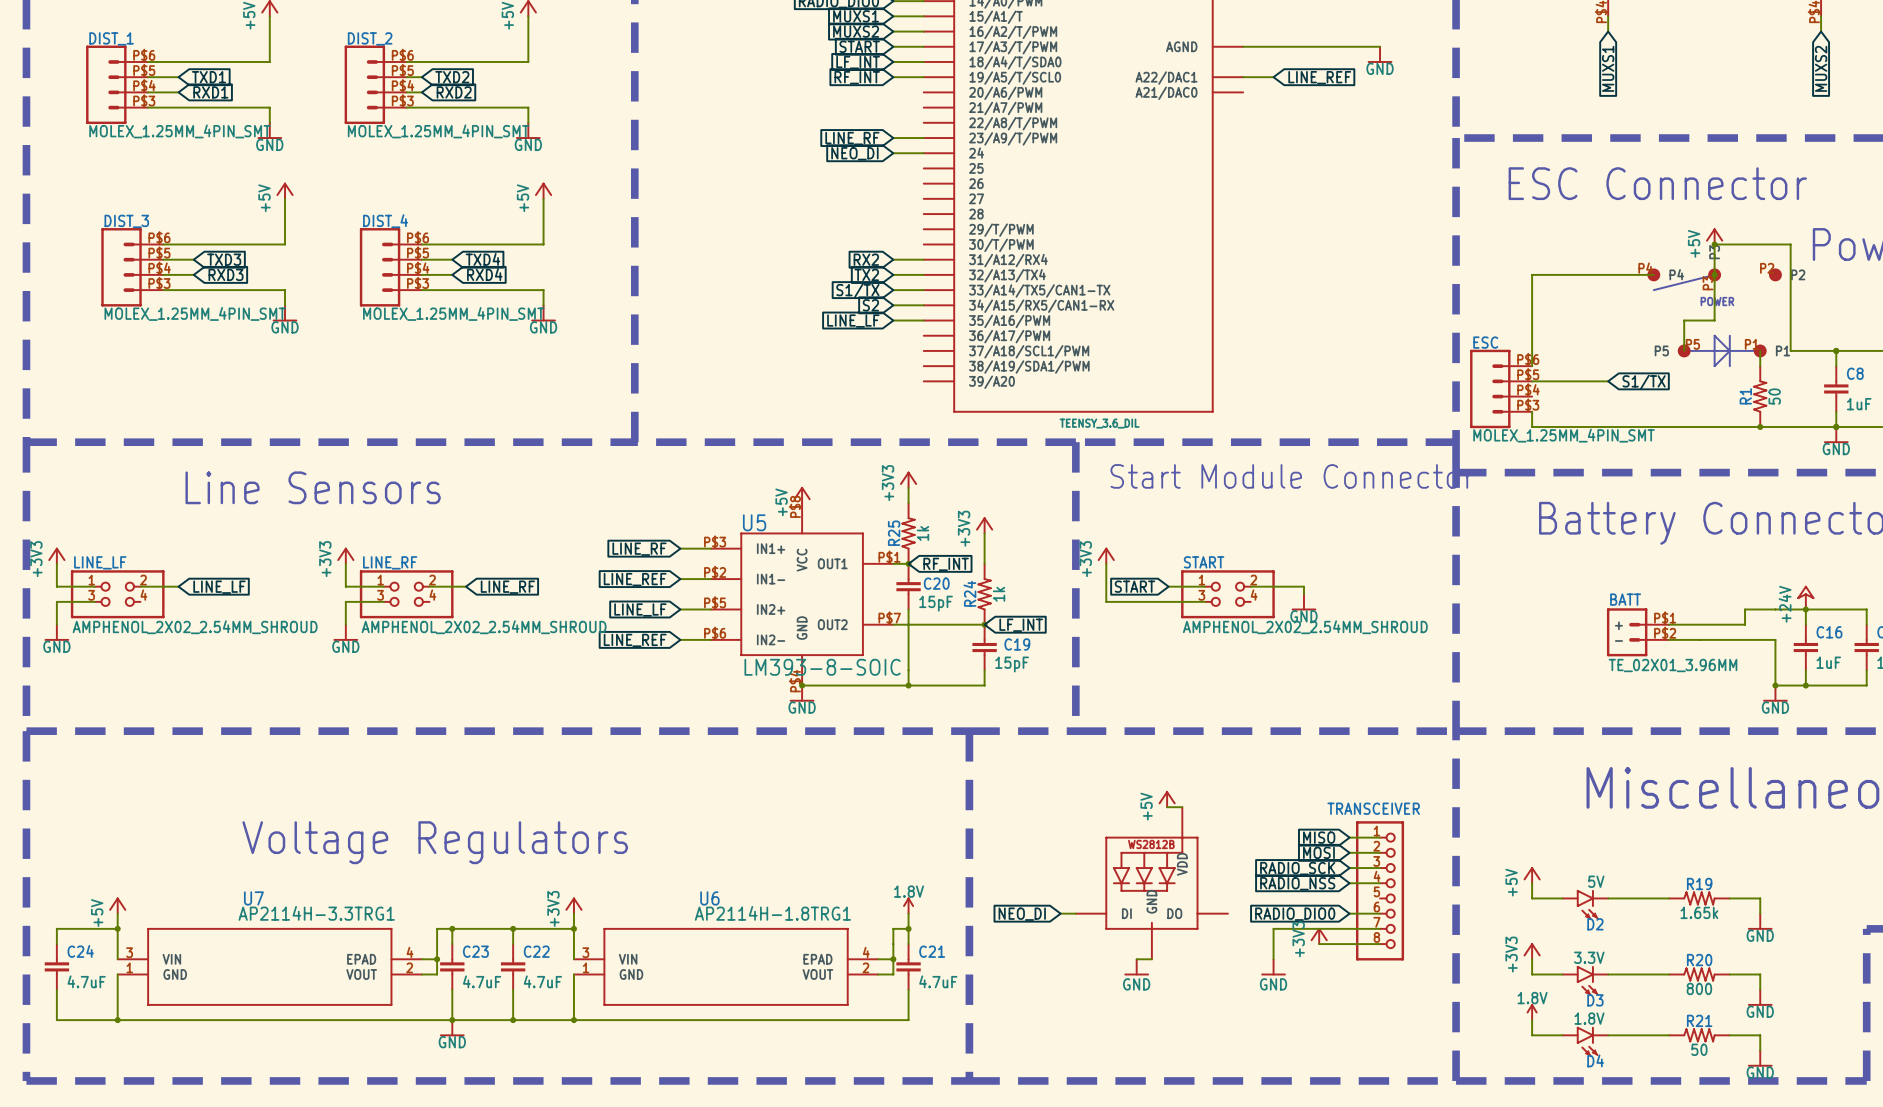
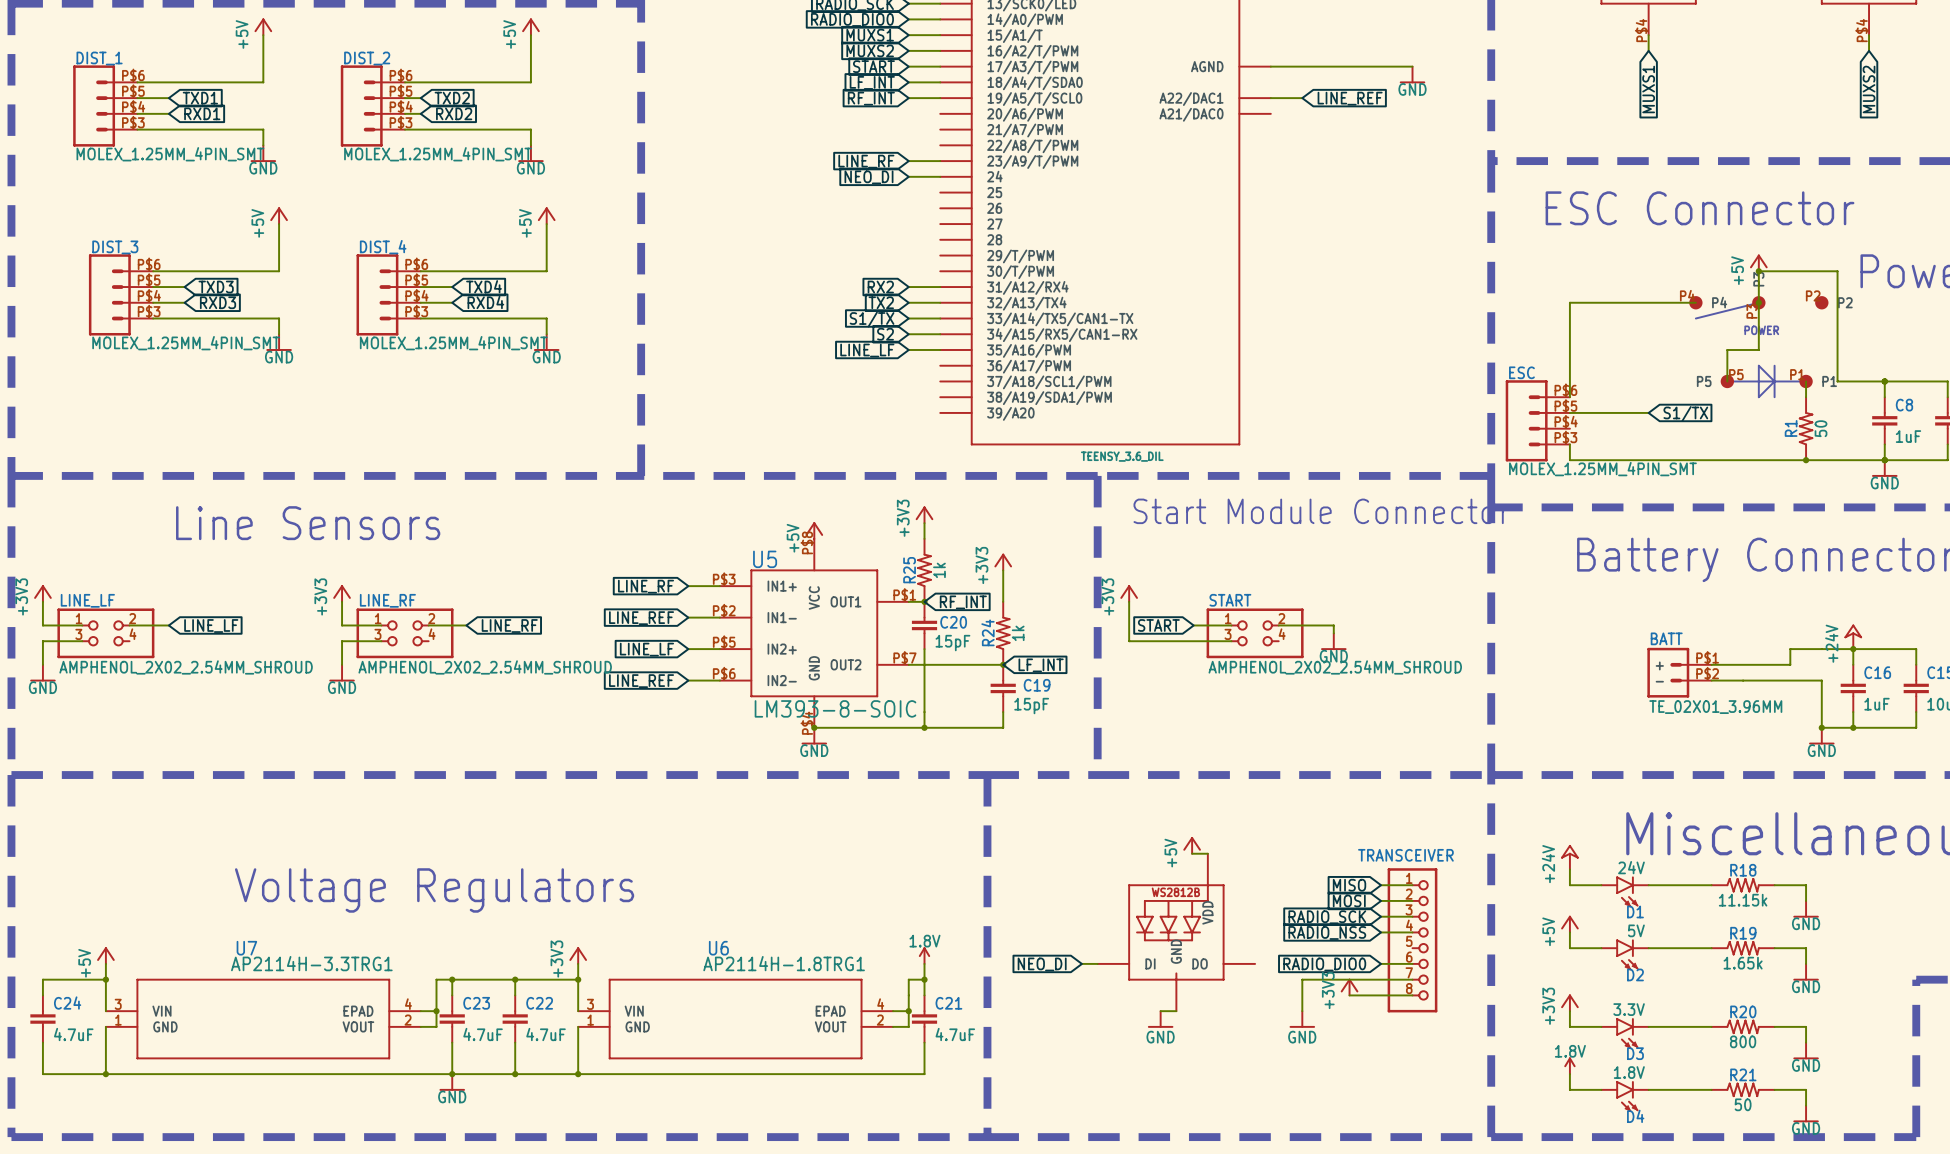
power symbol: none -> +24V (1569, 857)
wire: none -> (1569, 869) (1569, 885) (1601, 885)
wire: none -> (1648, 885) (1711, 885)
R18: none -> 11.15k (1743, 885)
wire: none -> (1774, 885) (1806, 885) (1806, 900)
D1: none -> 24V (1625, 891)
power symbol: none -> GND (1806, 909)

